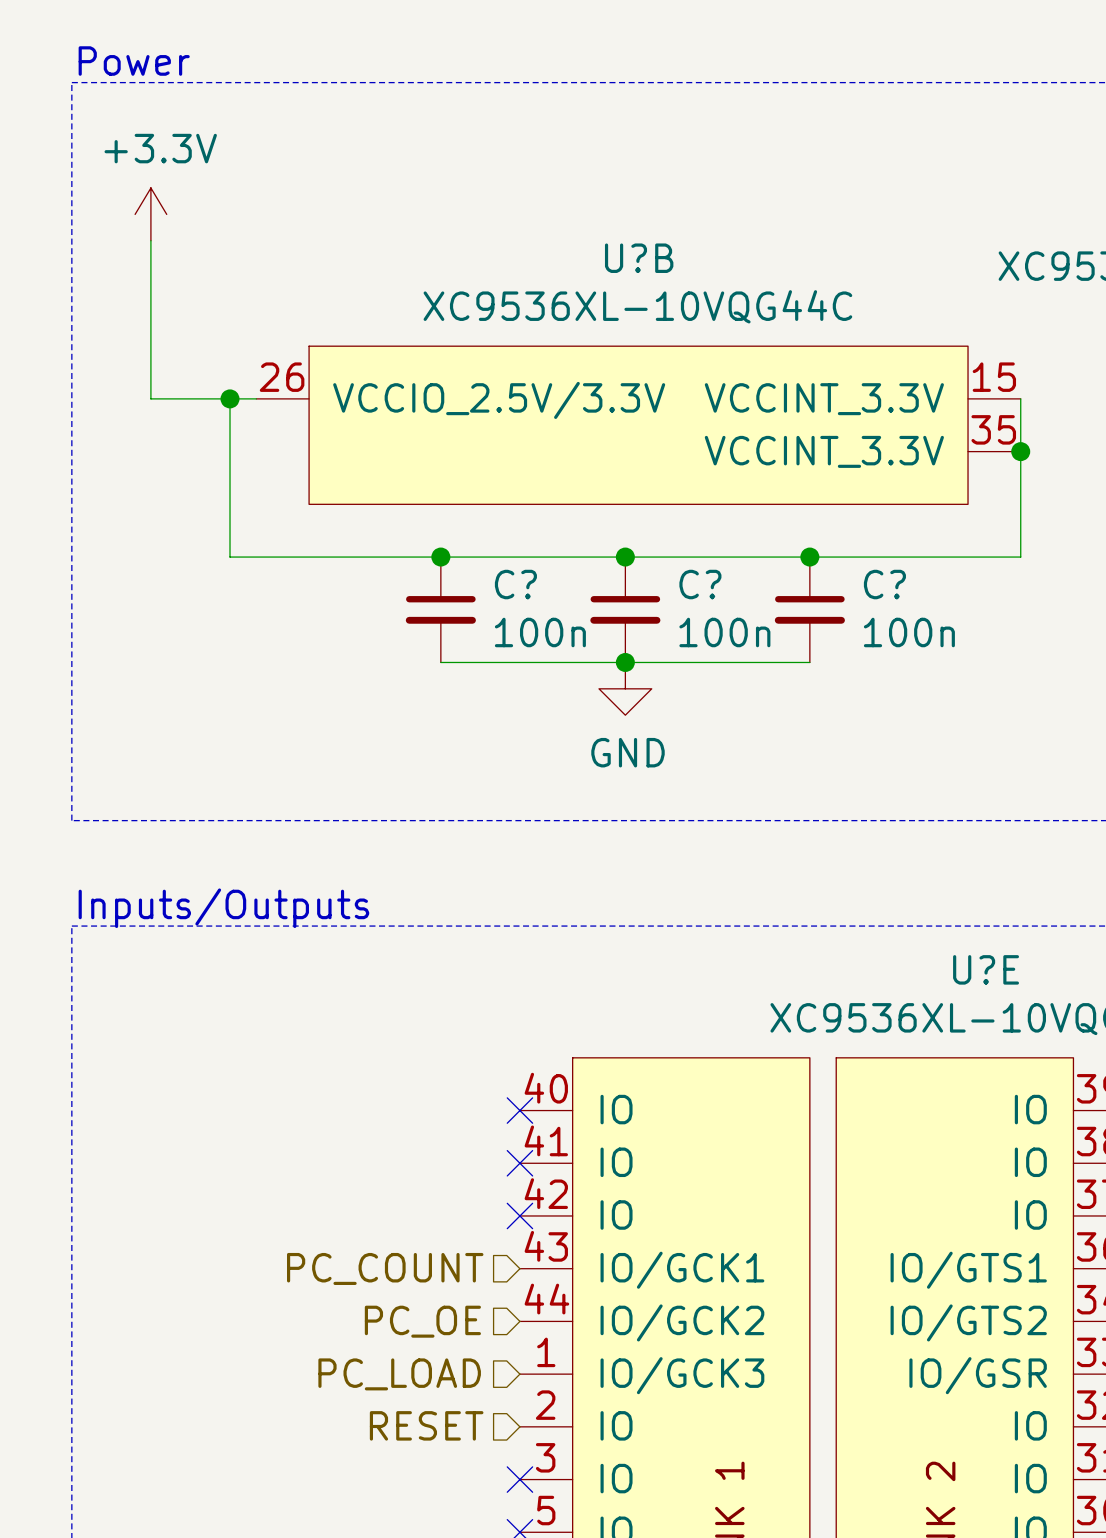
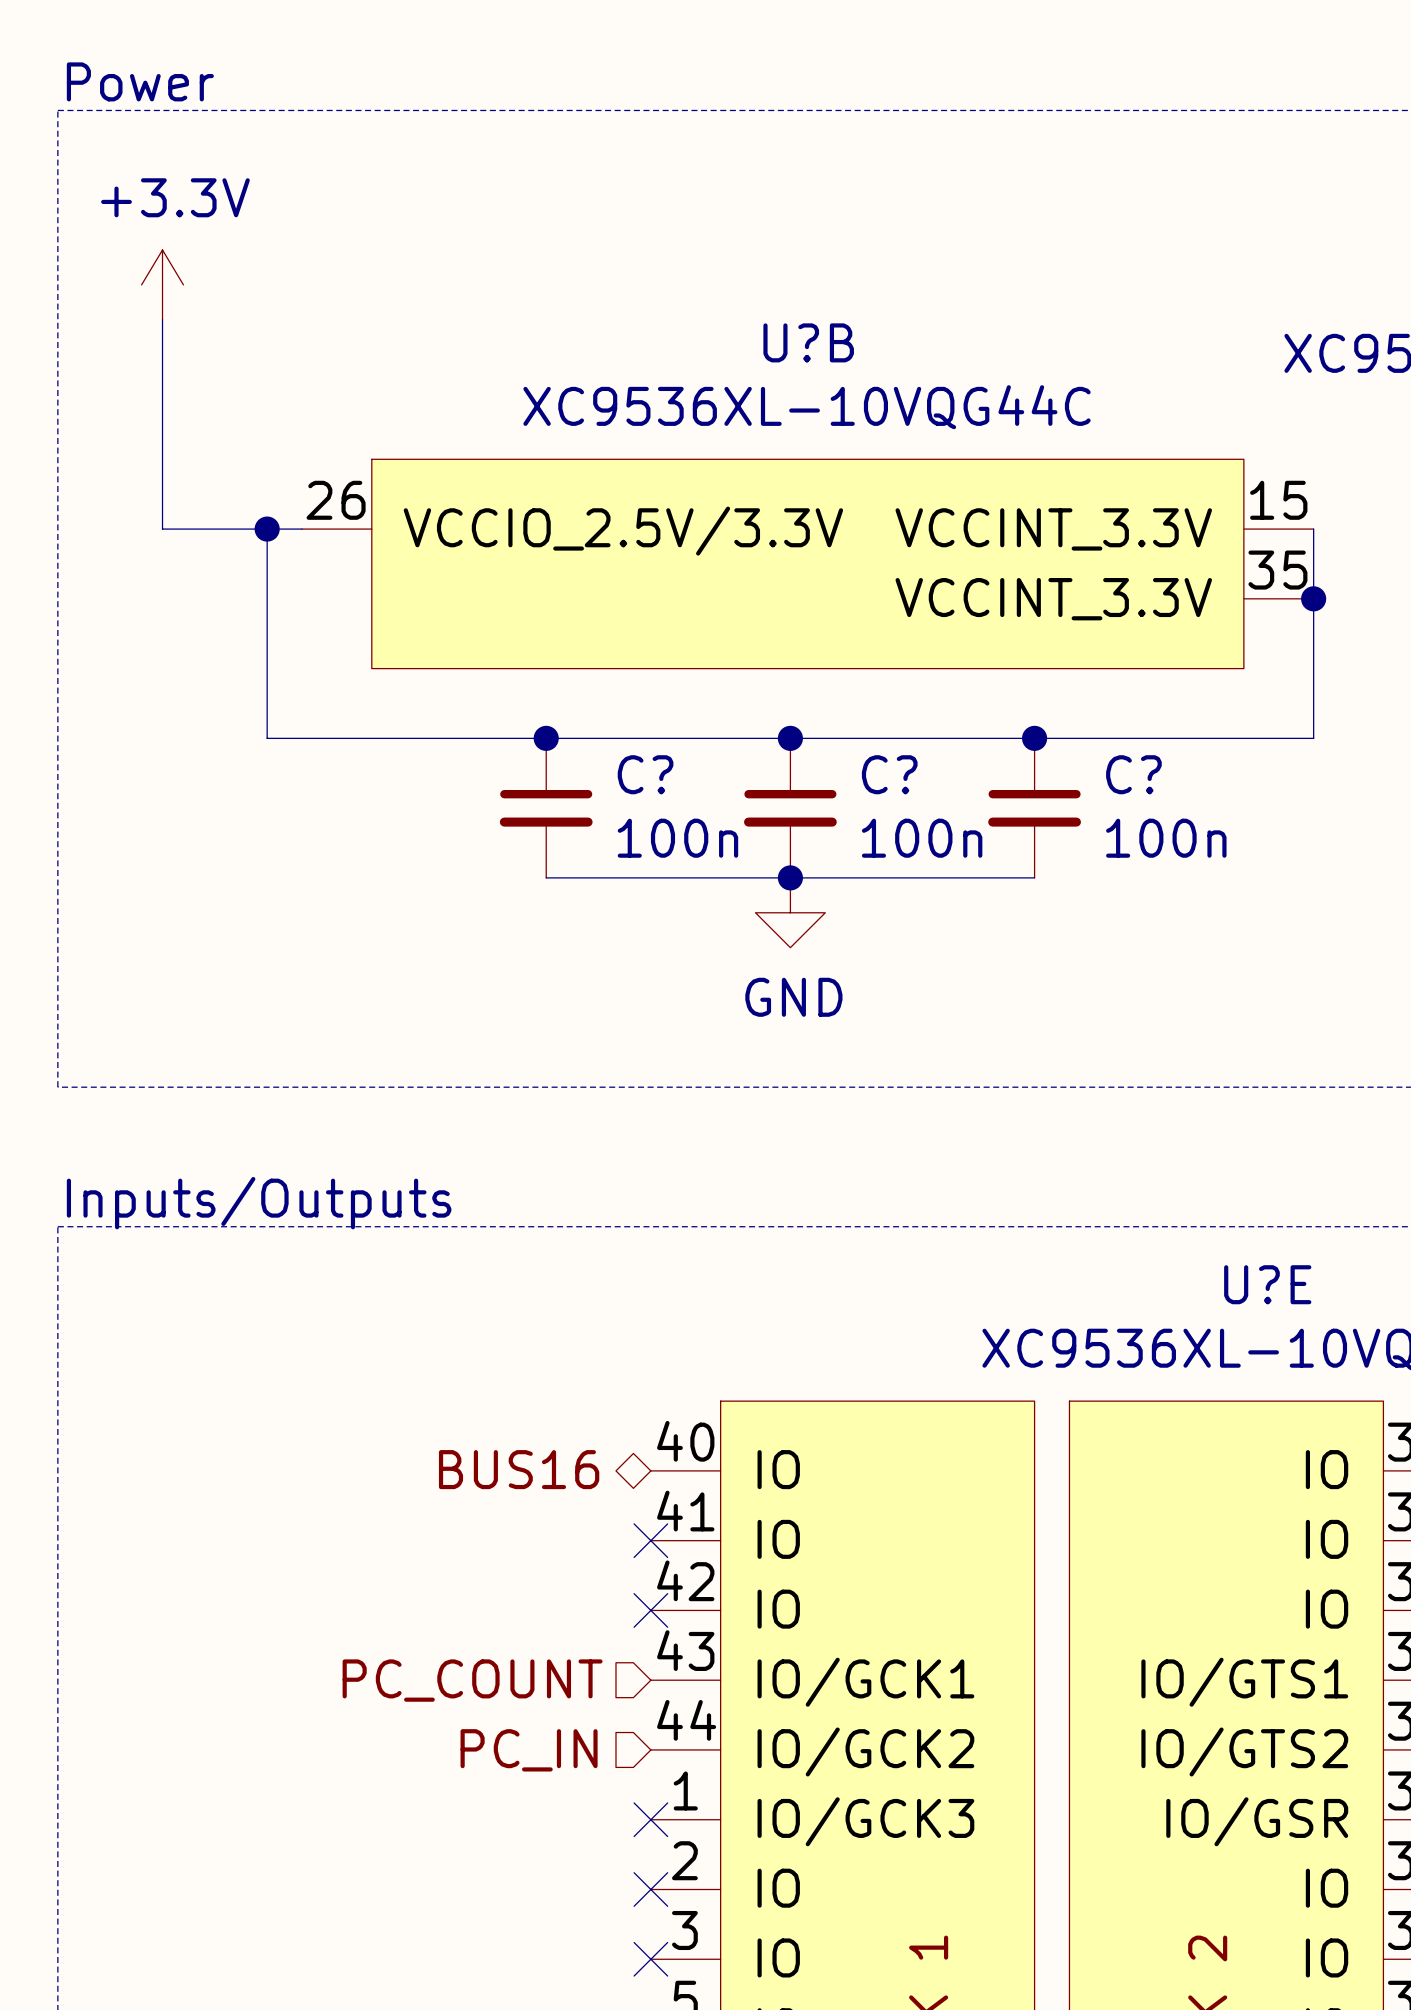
hierarchical label: none -> BUS16 (519, 1469)
no-connect mark: (519, 1110) -> none
hierarchical label: PC_OE (422, 1321) -> PC_IN (529, 1750)
hierarchical label: PC_LOAD (399, 1374) -> none
no-connect mark: none -> (650, 1819)
hierarchical label: RESET (426, 1425) -> none
no-connect mark: none -> (650, 1889)

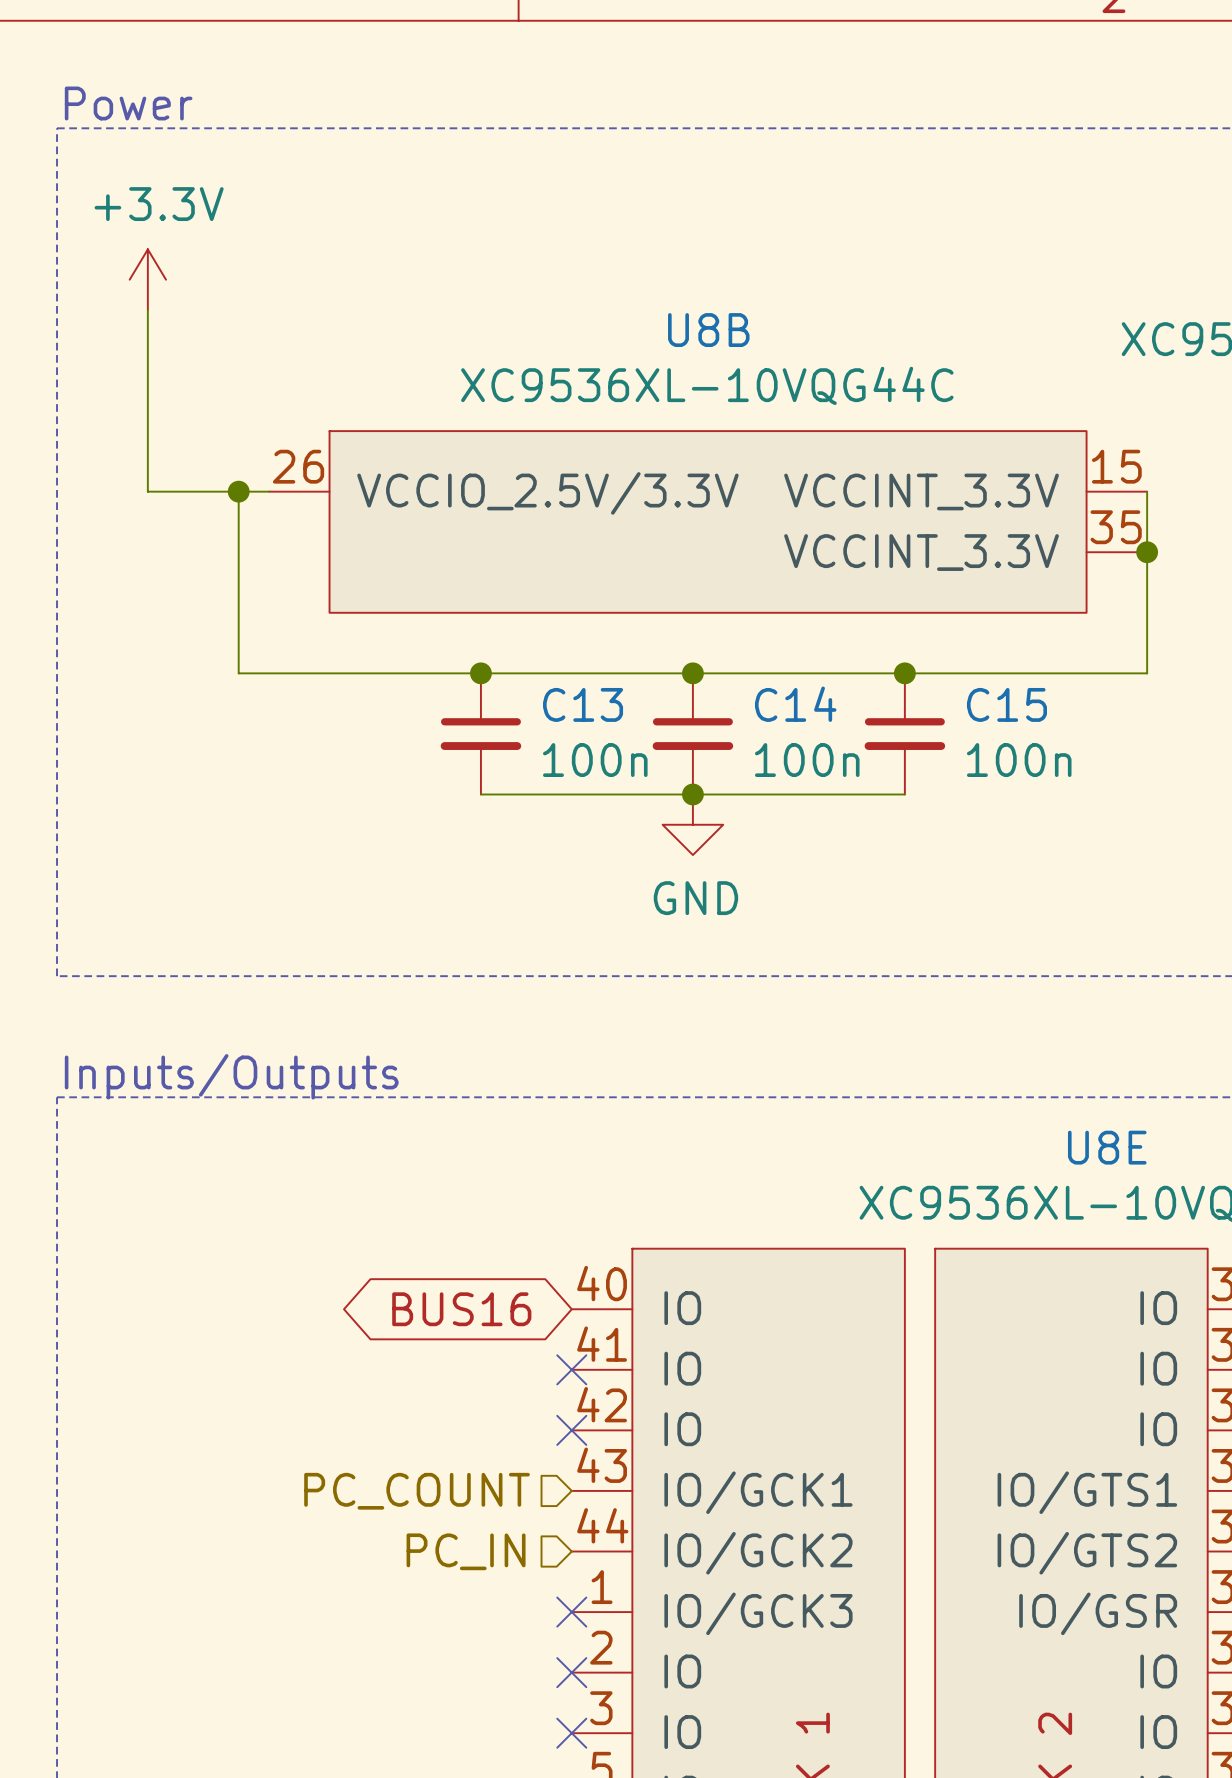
U?B name: U?B (808, 342) -> U8B (708, 330)
C? name: C? (645, 774) -> C13 (583, 704)
C? name: C? (889, 774) -> C14 (795, 704)
C? name: C? (1133, 774) -> C15 (1006, 704)
U?E name: U?E (1267, 1284) -> U8E (1107, 1147)
hierarchical label: BUS16 (519, 1469) -> none
global label: none -> BUS16 (461, 1309)

